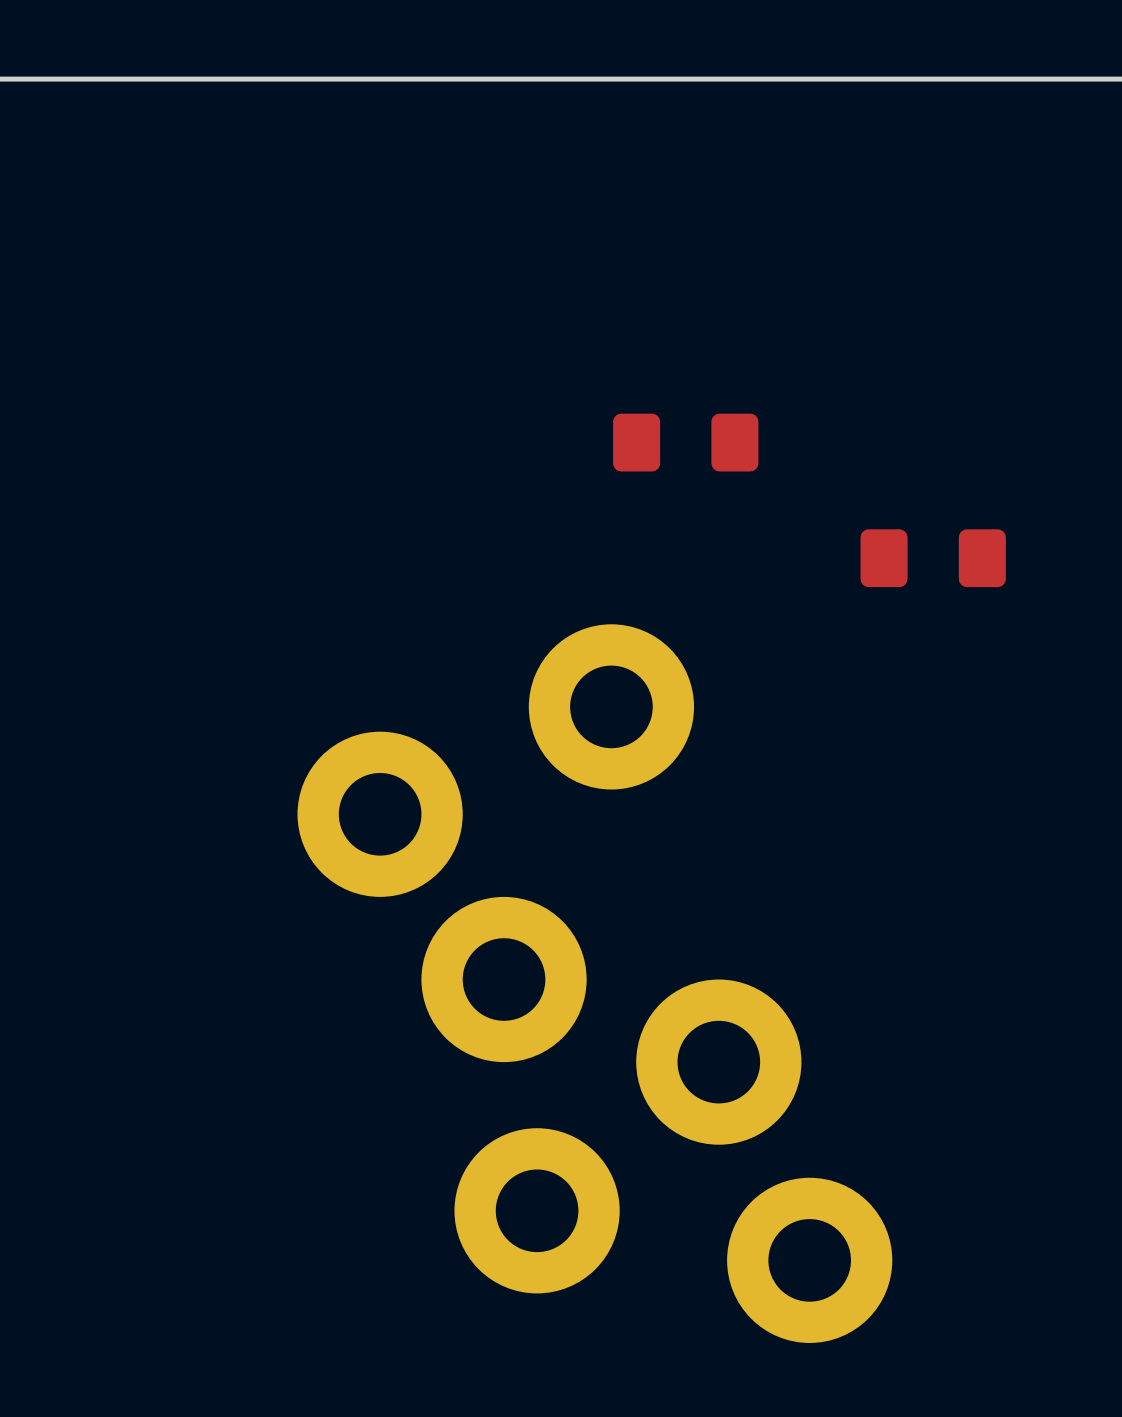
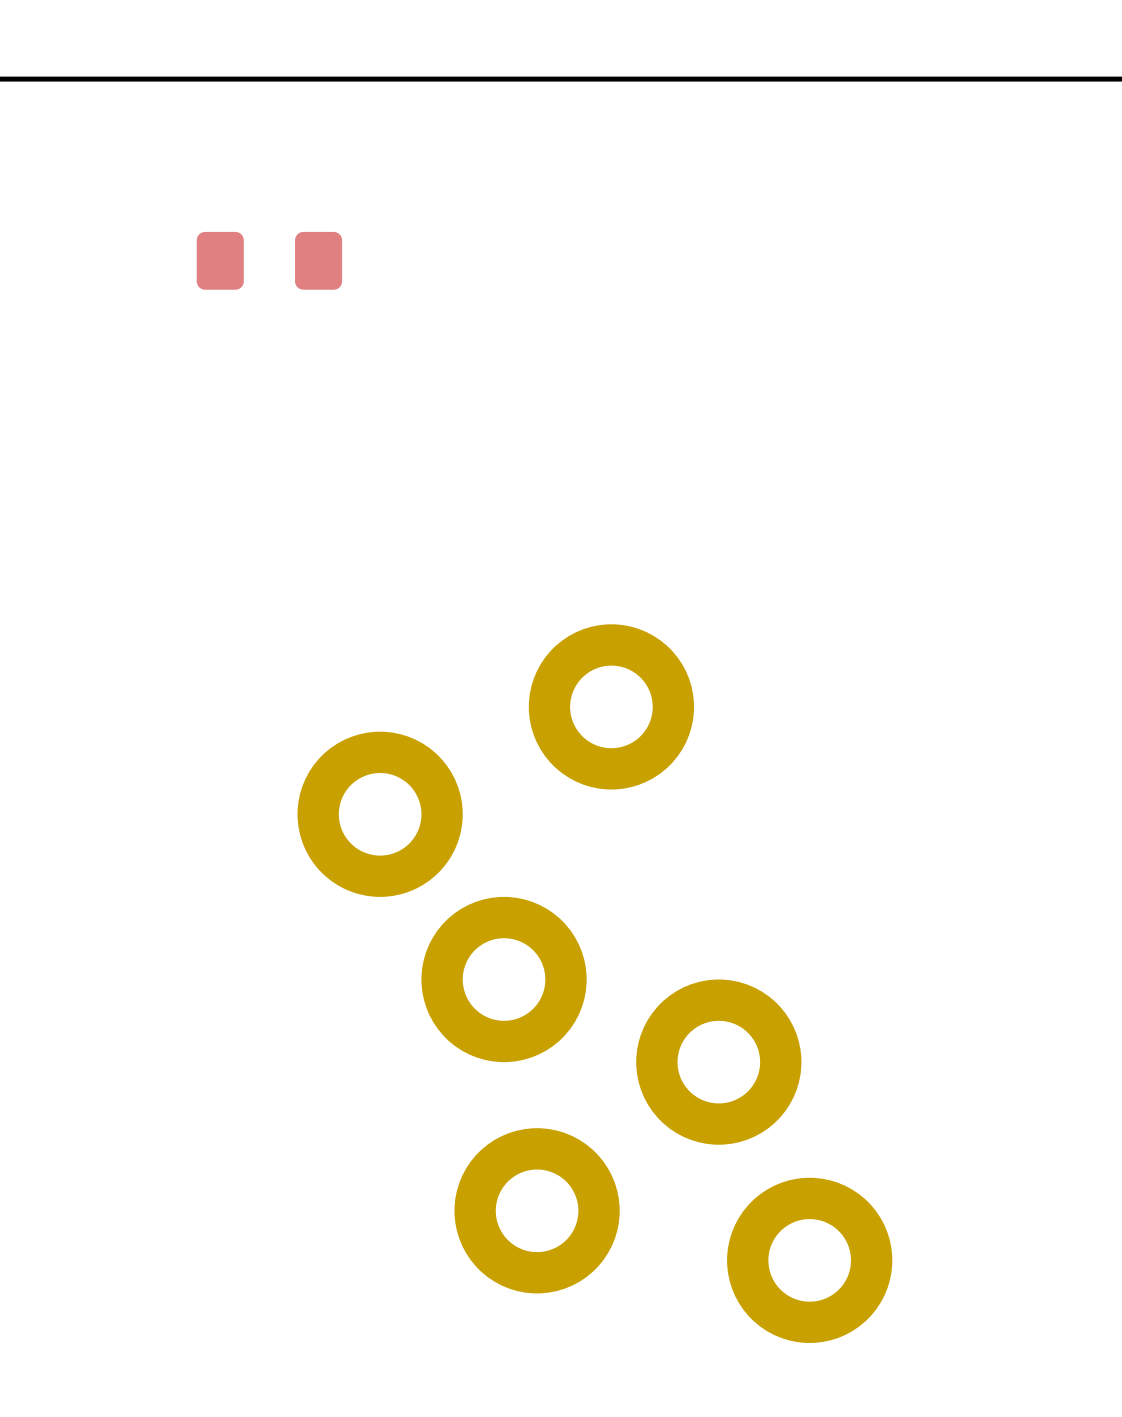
part: none -> (269, 260)
part: (685, 442) -> none
part: (933, 558) -> none

